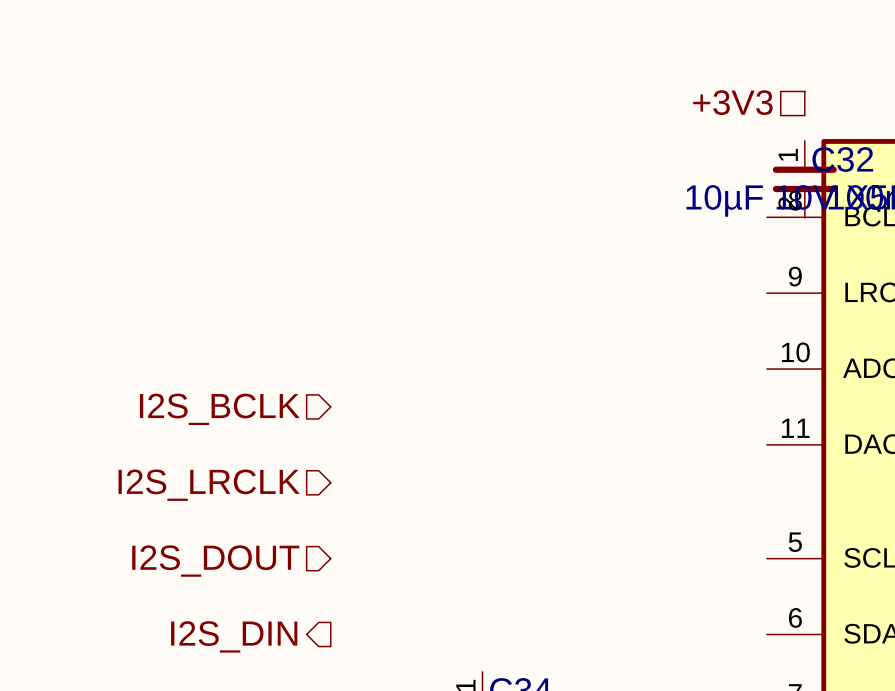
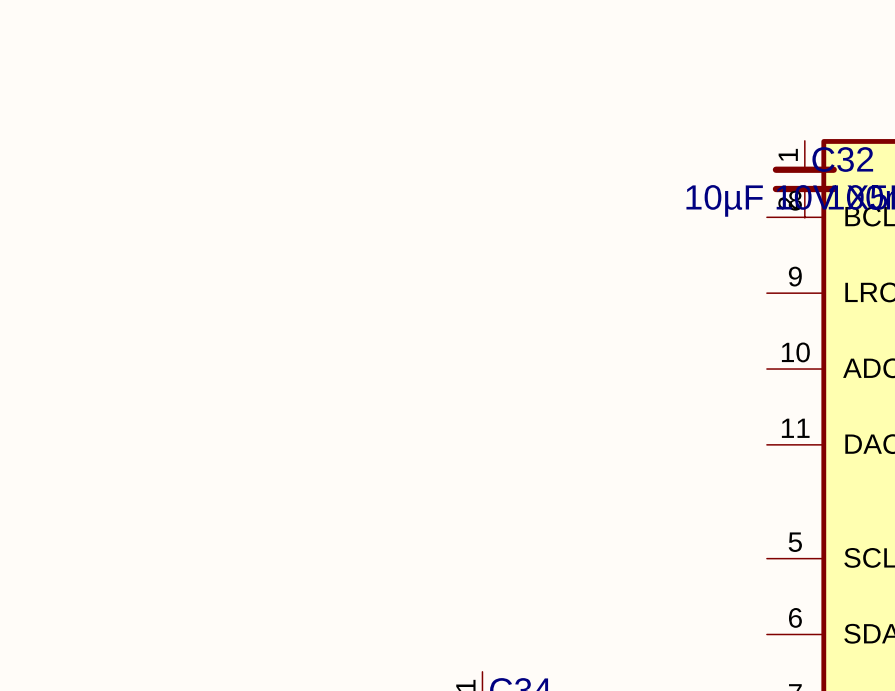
hierarchical label: +3V3 (732, 102) -> none
hierarchical label: I2S_BCLK (219, 409) -> none
hierarchical label: I2S_LRCLK (209, 485) -> none
hierarchical label: I2S_DOUT (215, 561) -> none
hierarchical label: I2S_DIN (234, 636) -> none

